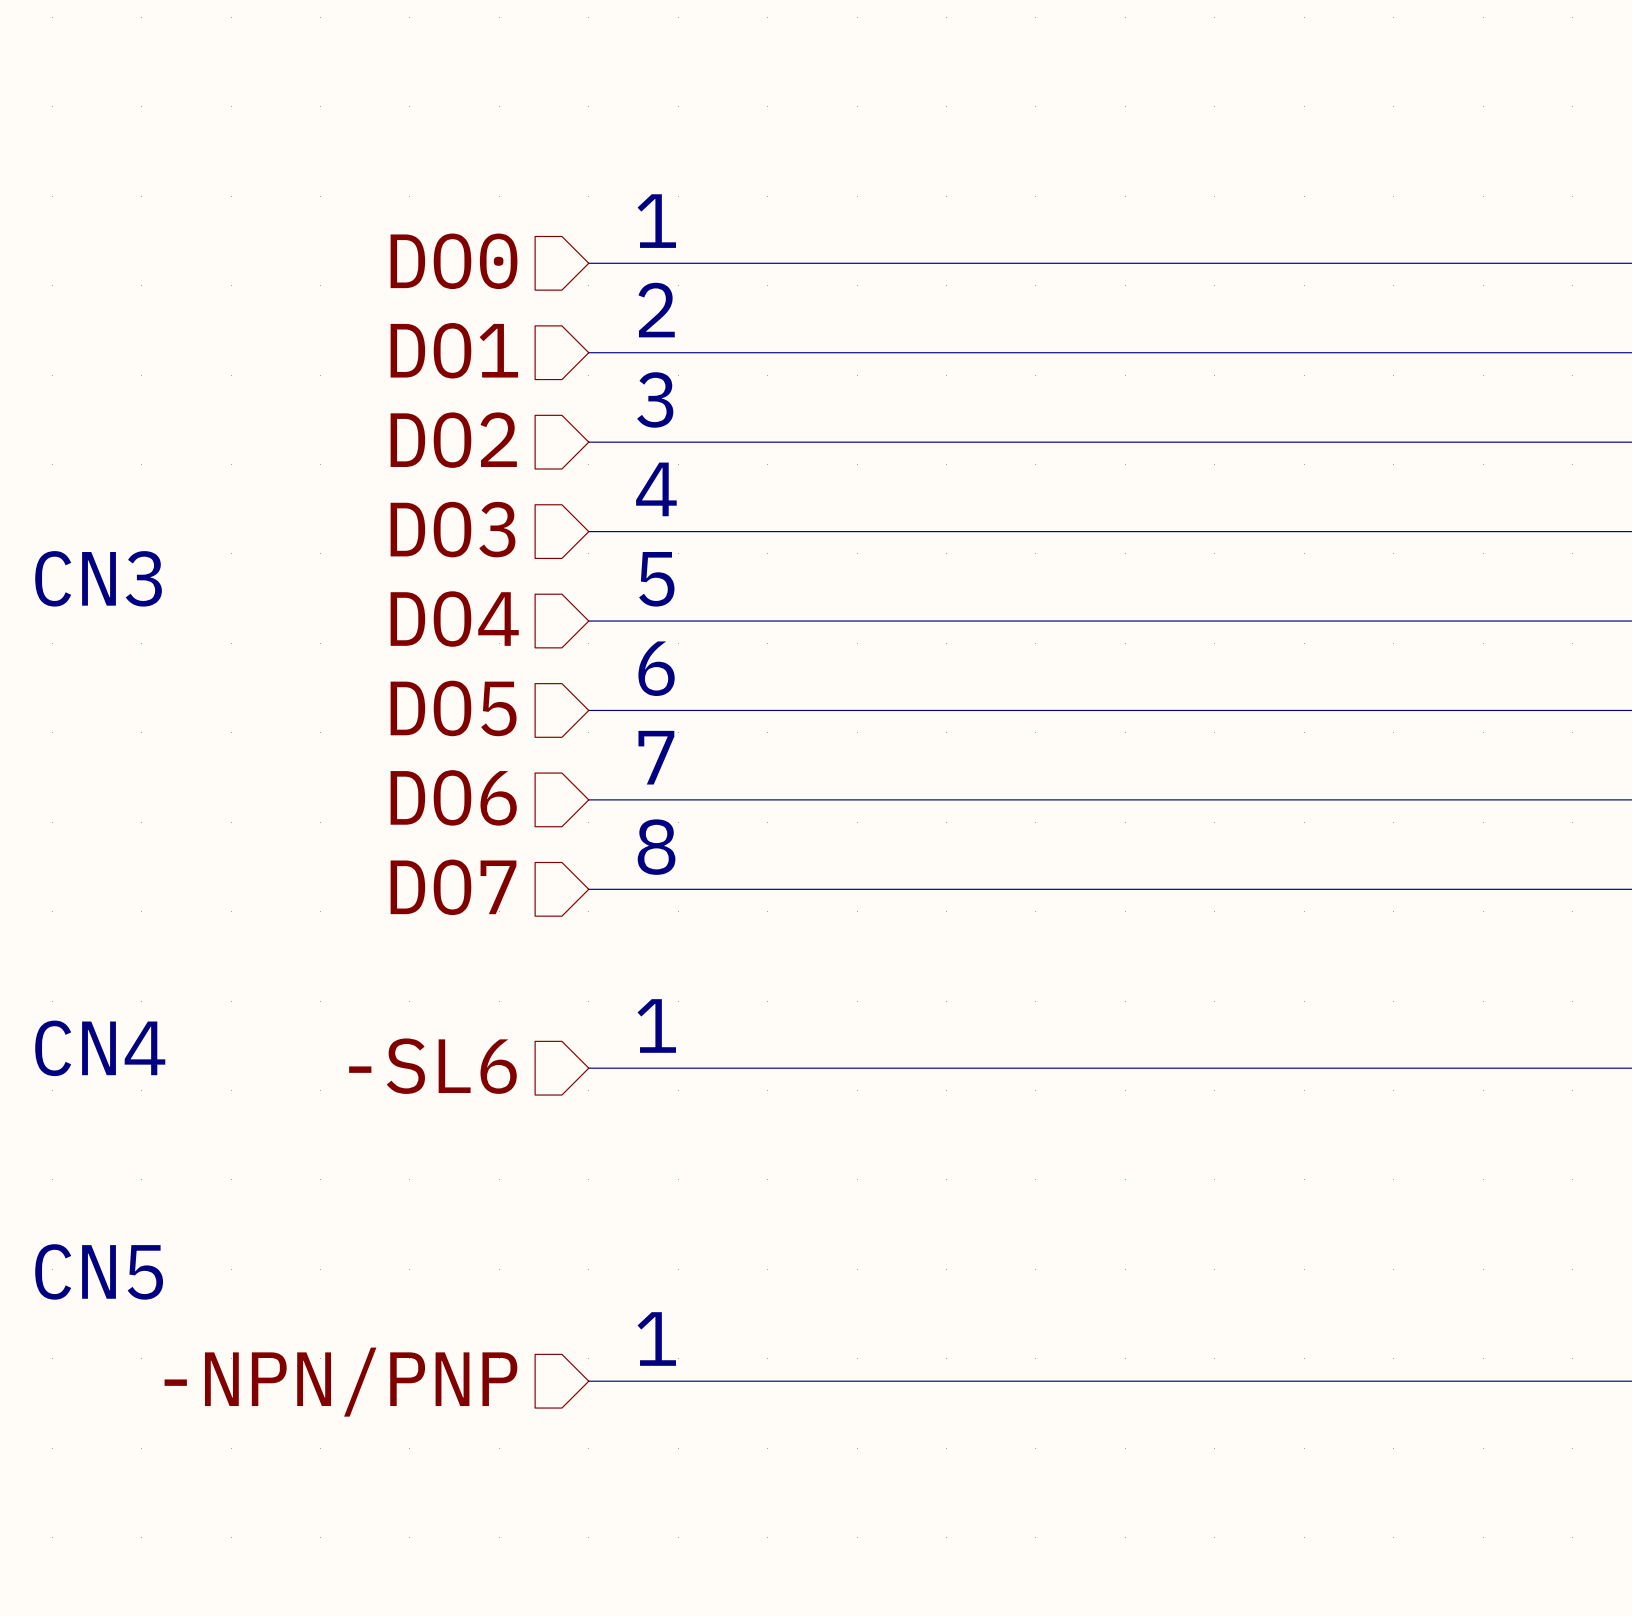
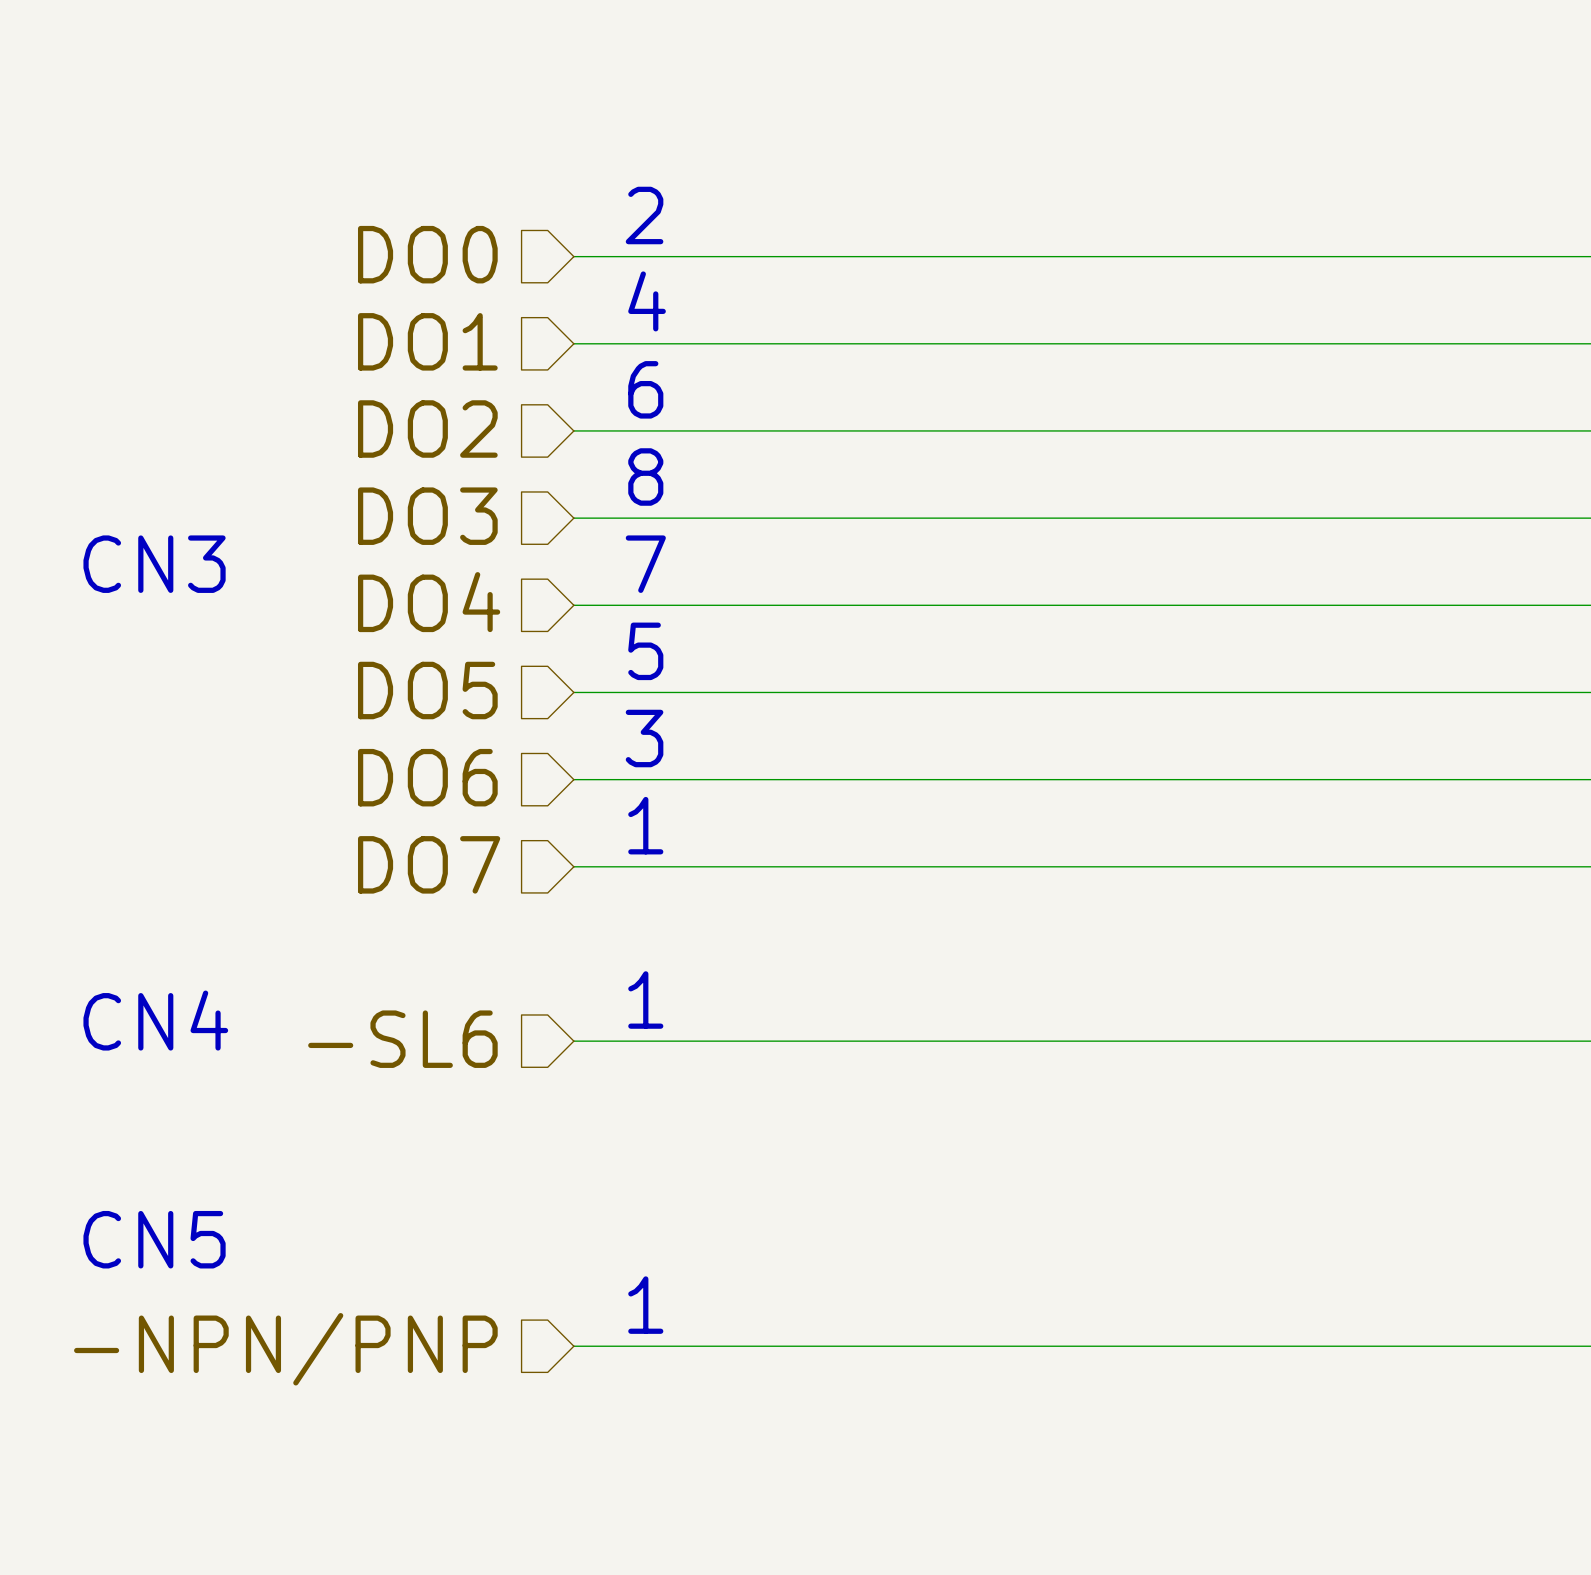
text: 1 (656, 221) -> 2 (644, 215)
text: 2 (656, 310) -> 4 (647, 301)
text: 3 (655, 399) -> 6 (645, 389)
text: 4 (656, 489) -> 8 (645, 477)
text position: CN3 (98, 578) -> CN3 (154, 564)
text: 5 (656, 579) -> 7 (645, 564)
text: 6 (656, 668) -> 5 (645, 651)
text: 7 (656, 757) -> 3 (644, 738)
text: 8 (656, 847) -> 1 (645, 825)
text position: CN4 (100, 1048) -> CN4 (155, 1020)
text position: CN5 (99, 1271) -> CN5 (154, 1239)

